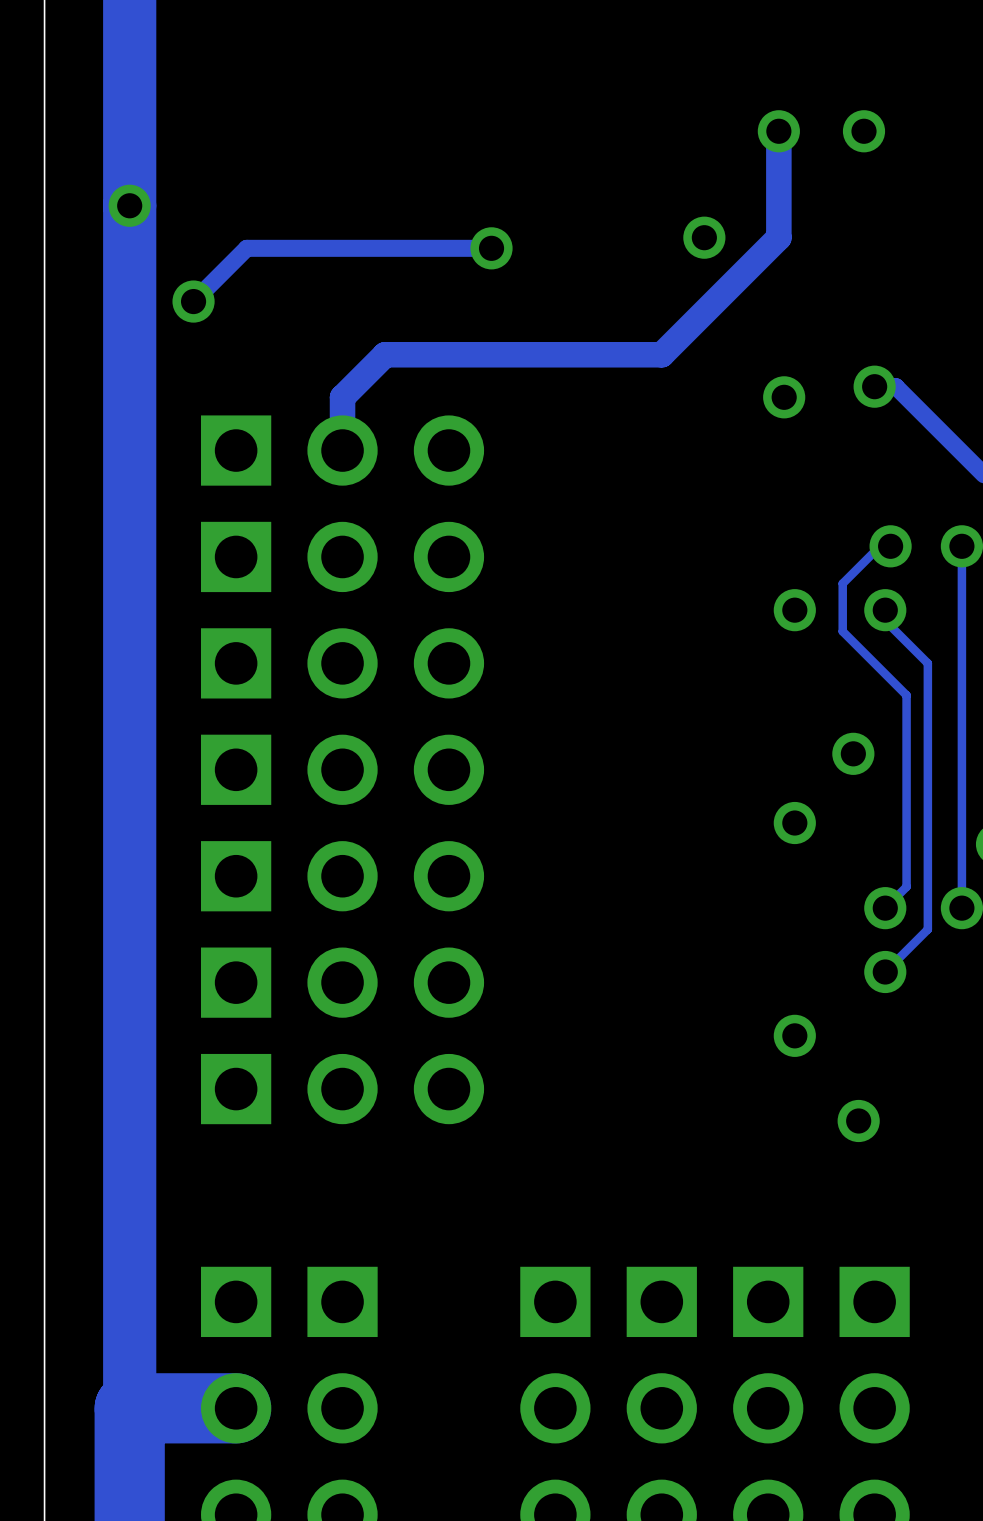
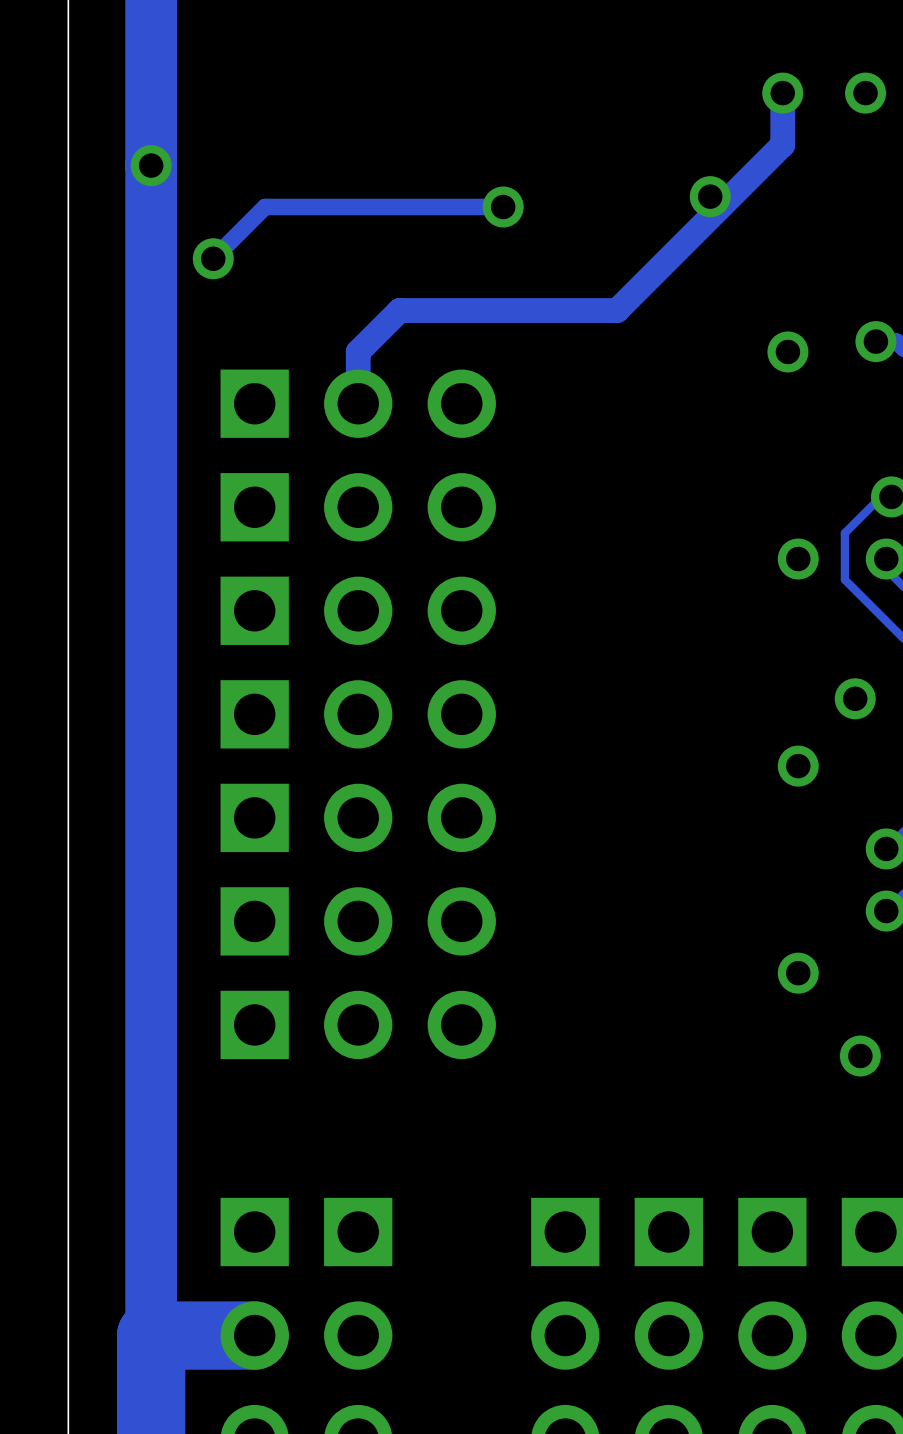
track: (778, 184) (778, 237) (661, 354) (608, 354) -> (782, 144) (617, 310)

